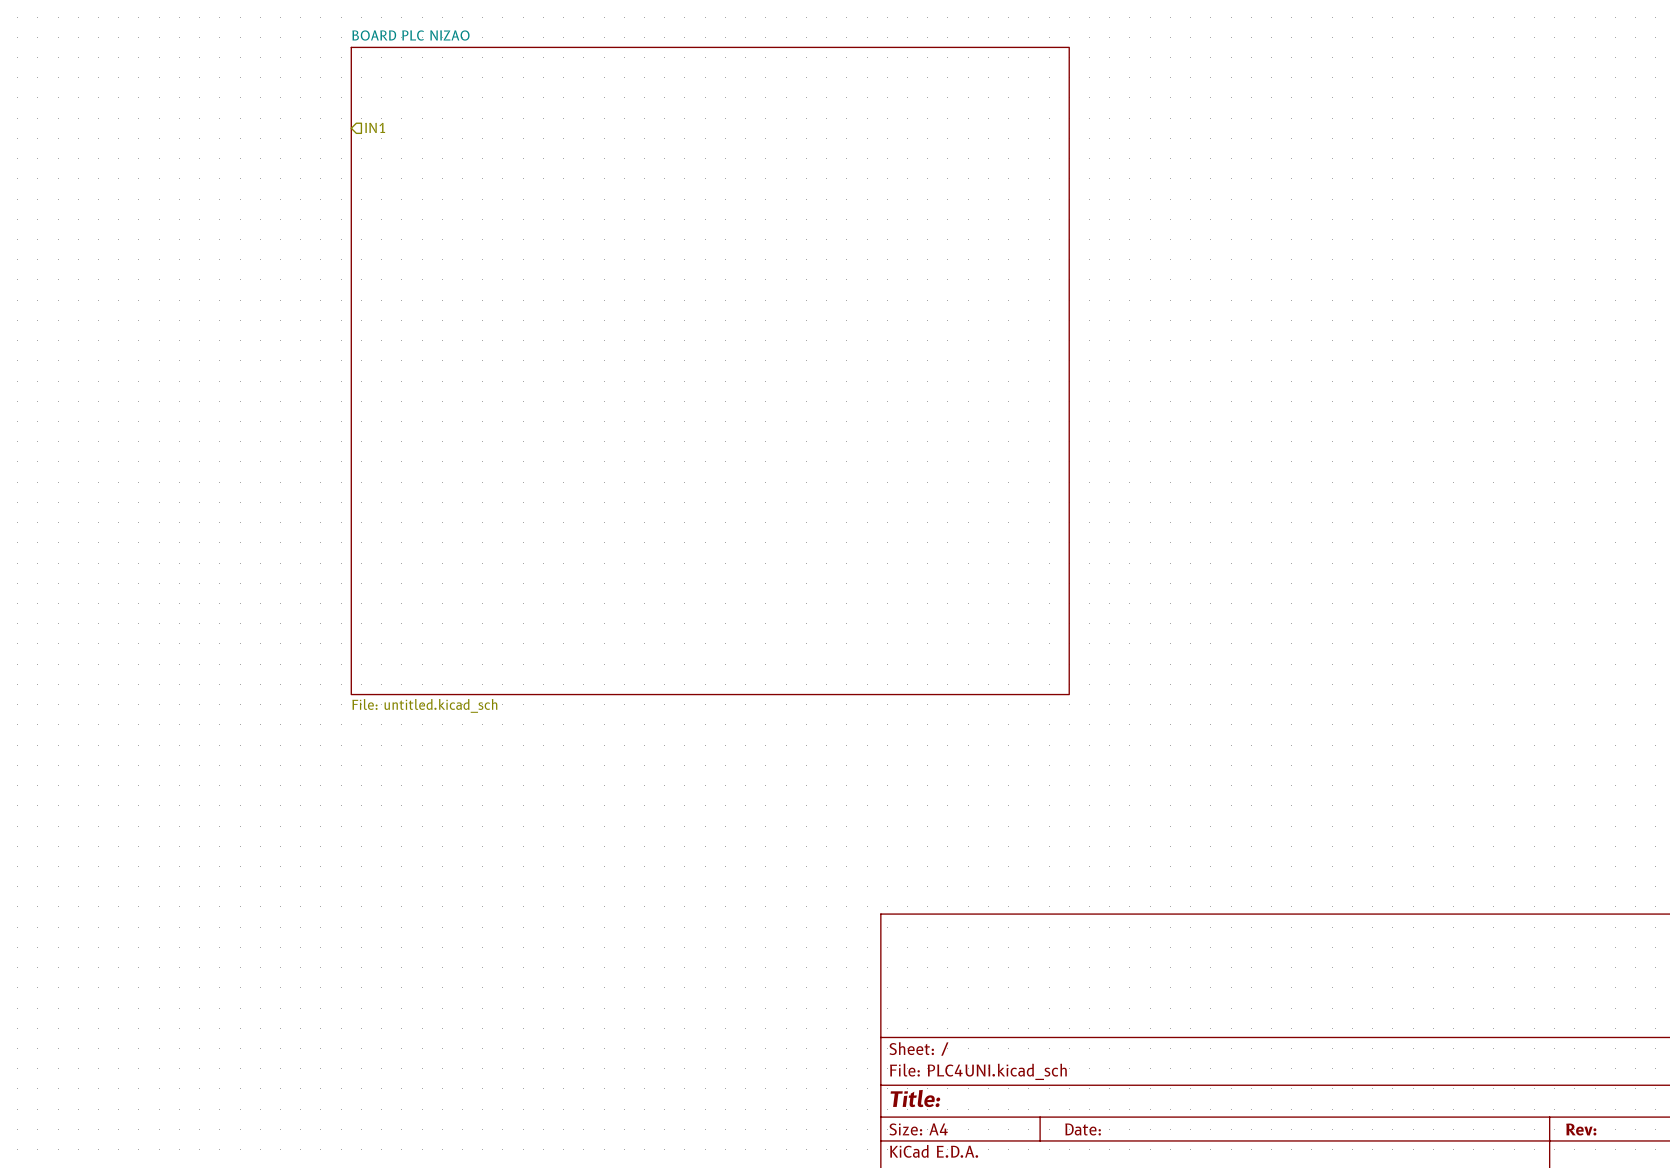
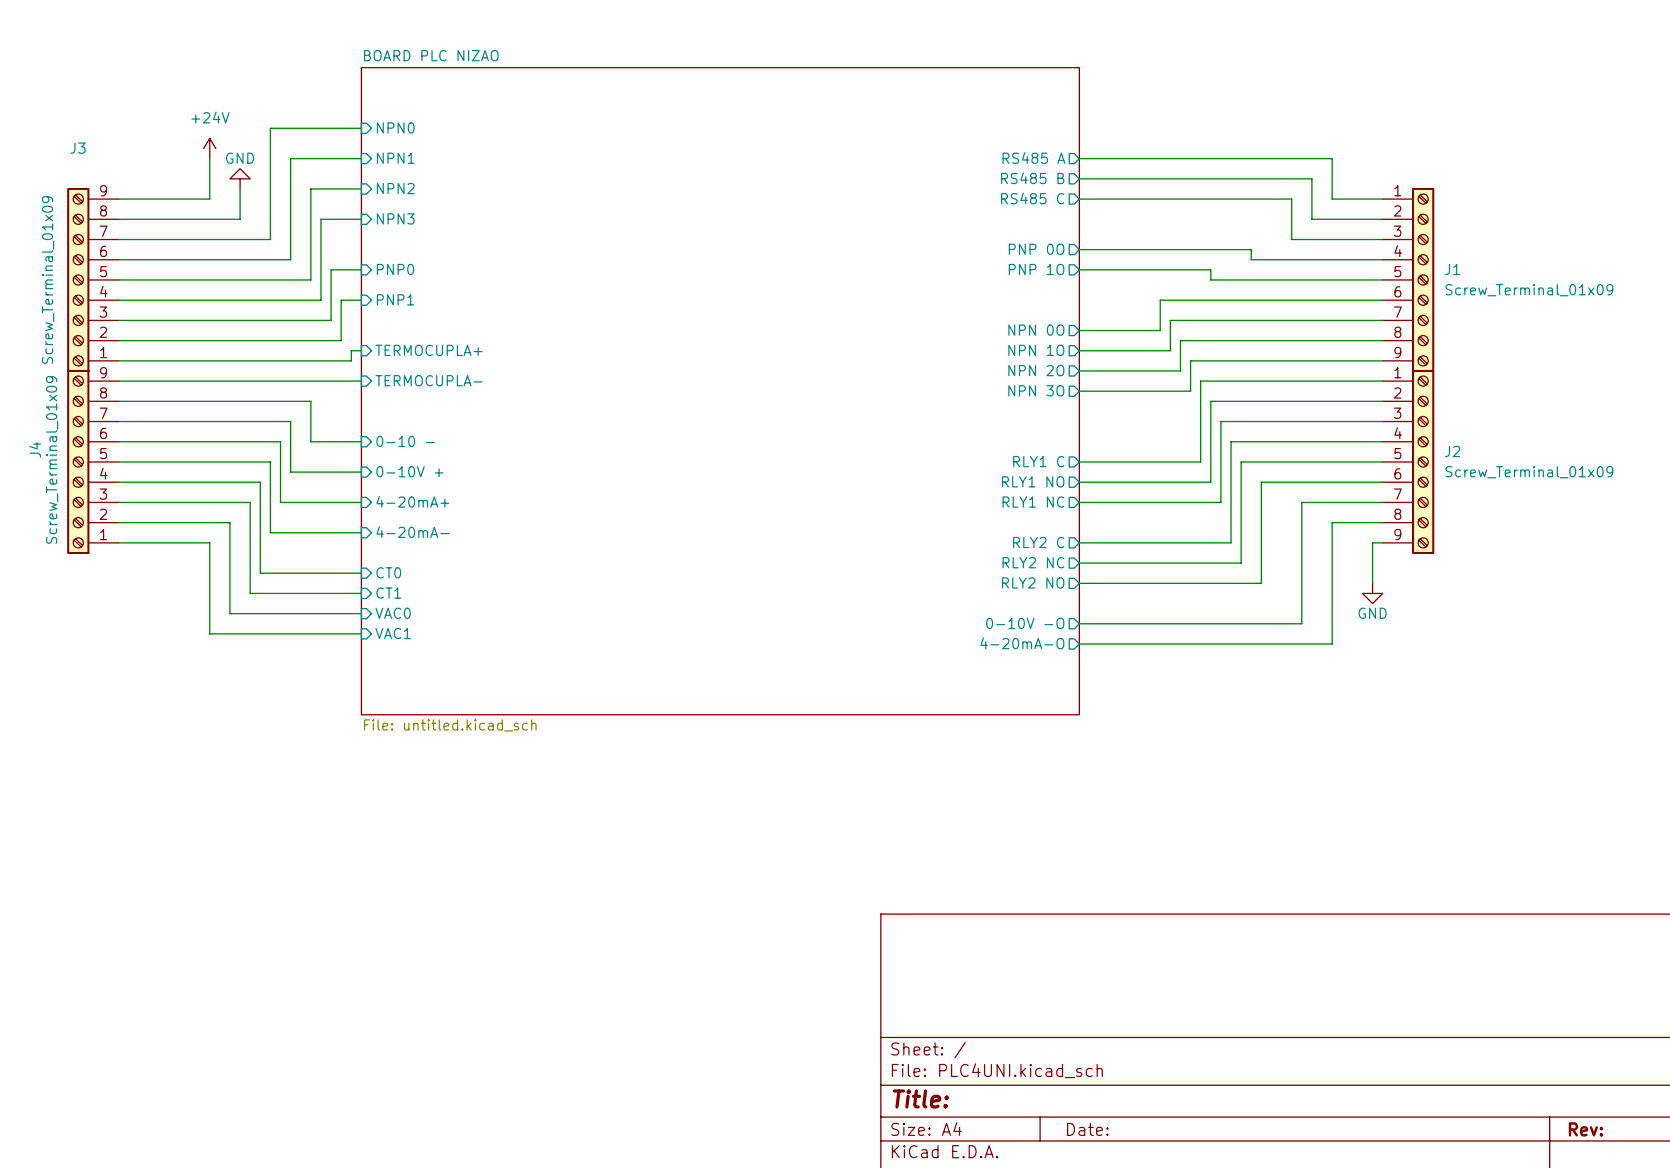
hierarchical label: IN1 (375, 127) -> none
sheet pin: none -> NPN0 (395, 127)
wire: none -> (361, 128) (270, 128) (270, 239) (118, 239)
power symbol: none -> +24V (209, 148)
wire: none -> (209, 158) (209, 199) (118, 199)
wire: none -> (361, 158) (290, 158) (290, 259) (118, 259)
sheet pin: none -> NPN1 (395, 158)
sheet pin: none -> RS485 A (1033, 158)
wire: none -> (1079, 158) (1332, 158) (1332, 199) (1382, 199)
power symbol: none -> GND (240, 178)
sheet pin: none -> RS485 B (1032, 178)
wire: none -> (1079, 178) (1311, 178) (1311, 219) (1382, 219)
wire: none -> (240, 188) (240, 219) (118, 219)
wire: none -> (361, 188) (310, 188) (310, 279) (118, 279)
sheet pin: none -> NPN2 (395, 188)
sheet pin: none -> RS485 C (1032, 198)
wire: none -> (1079, 199) (1291, 199) (1291, 239) (1382, 239)
sheet pin: none -> NPN3 (395, 218)
wire: none -> (361, 219) (320, 219) (320, 300) (118, 300)
sheet pin: none -> PNP 0O (1036, 249)
wire: none -> (1079, 249) (1251, 249) (1251, 259) (1382, 259)
wire: none -> (361, 269) (331, 269) (331, 320) (118, 320)
sheet pin: none -> PNP0 (395, 269)
sheet pin: none -> PNP 1O (1036, 269)
wire: none -> (1079, 269) (1210, 269) (1210, 279) (1382, 279)
J3: none -> Screw_Terminal_01x09 (92, 279)
J1: none -> Screw_Terminal_01x09 (1408, 279)
sheet pin: none -> PNP1 (395, 299)
wire: none -> (361, 300) (341, 300) (341, 340) (118, 340)
wire: none -> (1382, 300) (1160, 300) (1160, 330) (1079, 330)
wire: none -> (1382, 320) (1170, 320) (1170, 350) (1079, 350)
sheet pin: none -> NPN 0O (1036, 330)
wire: none -> (1382, 340) (1180, 340) (1180, 370) (1079, 370)
wire: none -> (361, 350) (351, 350) (351, 360) (118, 360)
sheet pin: none -> TERMOCUPLA+ (428, 350)
sheet pin: none -> NPN 1O (1036, 350)
wire: none -> (1382, 360) (1190, 360) (1190, 391) (1079, 391)
sheet BOARD PLC NIZAO position: (710, 370) -> (720, 391)
sheet pin: none -> NPN 2O (1036, 370)
sheet pin: none -> TERMOCUPLA- (428, 380)
wire: none -> (118, 381) (361, 381)
wire: none -> (1382, 381) (1200, 381) (1200, 461) (1079, 461)
sheet pin: none -> NPN 3O (1036, 390)
wire: none -> (118, 401) (310, 401) (310, 441) (361, 441)
wire: none -> (1382, 401) (1210, 401) (1210, 482) (1079, 482)
wire: none -> (118, 421) (290, 421) (290, 472) (361, 472)
wire: none -> (1382, 421) (1220, 421) (1220, 502) (1079, 502)
wire: none -> (118, 441) (280, 441) (280, 502) (361, 502)
sheet pin: none -> 0-10 - (405, 441)
wire: none -> (1382, 441) (1231, 441) (1231, 542) (1079, 542)
J4: none -> Screw_Terminal_01x09 (92, 461)
wire: none -> (118, 461) (270, 461) (270, 532) (361, 532)
sheet pin: none -> RLY1 C (1038, 461)
wire: none -> (1382, 461) (1241, 461) (1241, 563) (1079, 563)
J2: none -> Screw_Terminal_01x09 (1408, 461)
sheet pin: none -> 0-10V + (409, 471)
sheet pin: none -> RLY1 NO (1033, 481)
wire: none -> (118, 482) (260, 482) (260, 573) (361, 573)
wire: none -> (1382, 482) (1261, 482) (1261, 583) (1079, 583)
wire: none -> (118, 502) (250, 502) (250, 593) (361, 593)
sheet pin: none -> 4-20mA+ (412, 501)
sheet pin: none -> RLY1 NC (1033, 502)
wire: none -> (1382, 502) (1301, 502) (1301, 623) (1079, 623)
wire: none -> (118, 522) (229, 522) (229, 613) (361, 613)
wire: none -> (1382, 522) (1332, 522) (1332, 643) (1079, 643)
sheet pin: none -> 4-20mA- (412, 532)
wire: none -> (118, 542) (209, 542) (209, 633) (361, 633)
sheet pin: none -> RLY2 C (1038, 542)
wire: none -> (1382, 542) (1372, 542) (1372, 583)
sheet pin: none -> RLY2 NC (1033, 562)
sheet pin: none -> CT0 (388, 572)
sheet pin: none -> RLY2 NO (1033, 582)
sheet pin: none -> CT1 (388, 593)
power symbol: none -> GND (1372, 593)
sheet pin: none -> VAC0 (393, 613)
sheet pin: none -> 0-10V -O (1025, 623)
sheet pin: none -> VAC1 (393, 633)
sheet pin: none -> 4-20mA-O (1022, 643)

